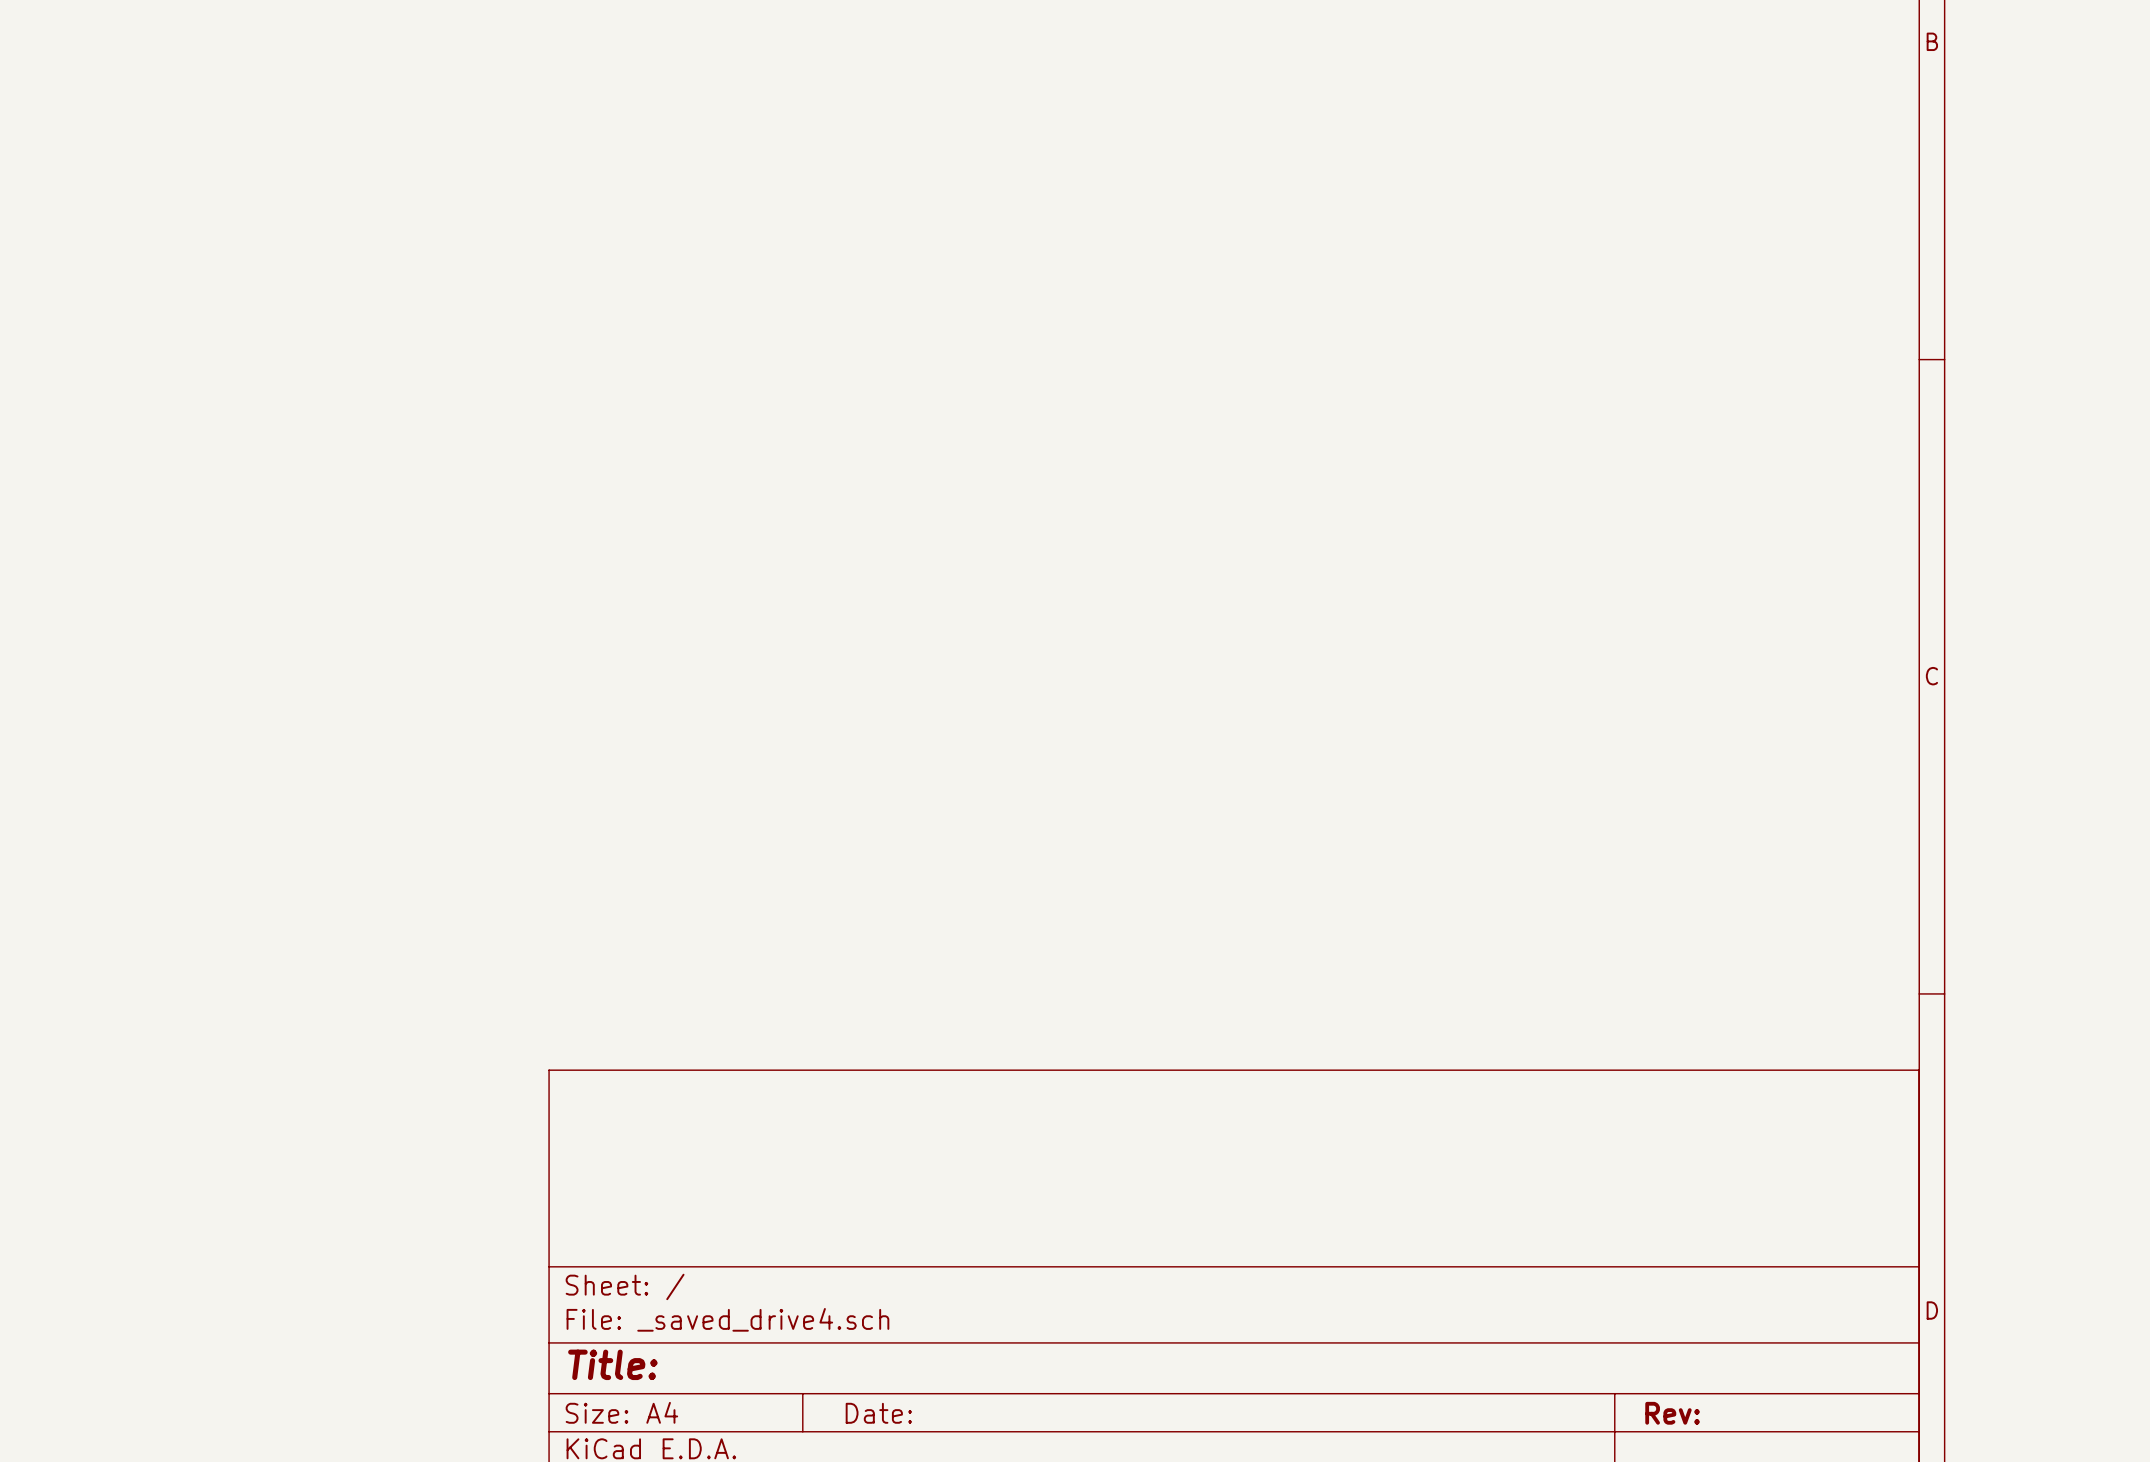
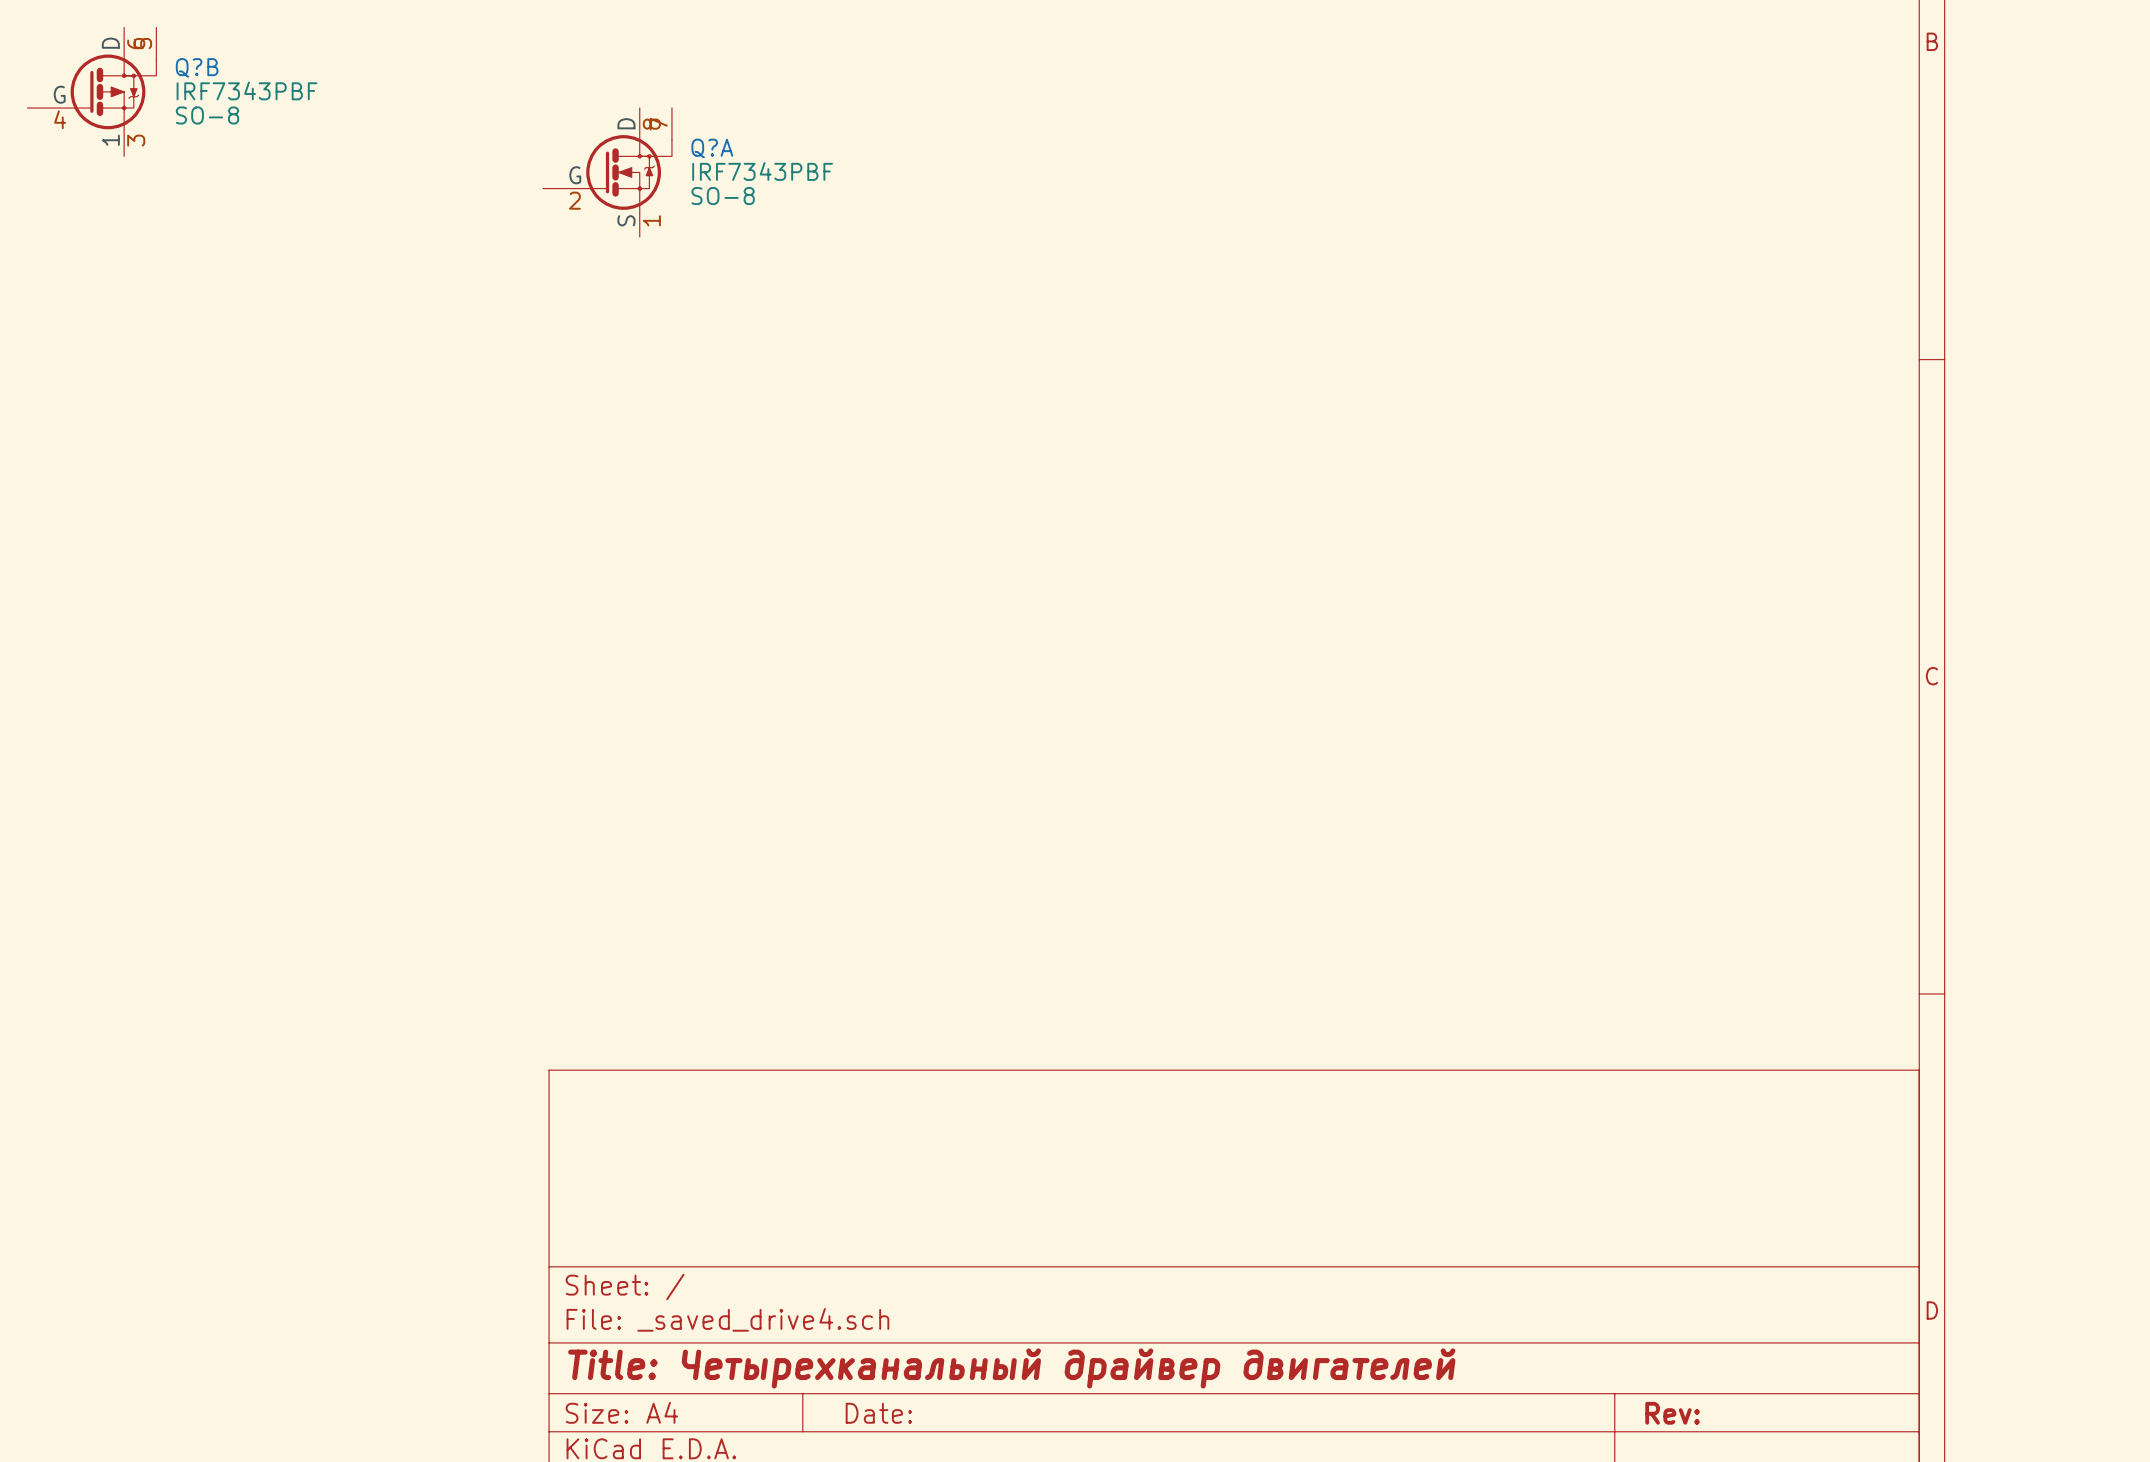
Q?B: none -> IRF7343PBF (91, 91)
Q?A: none -> IRF7343PBF (607, 172)
title block: Title: (612, 1364) -> Title: Четырехканальный драйвер двигателей (1011, 1368)

